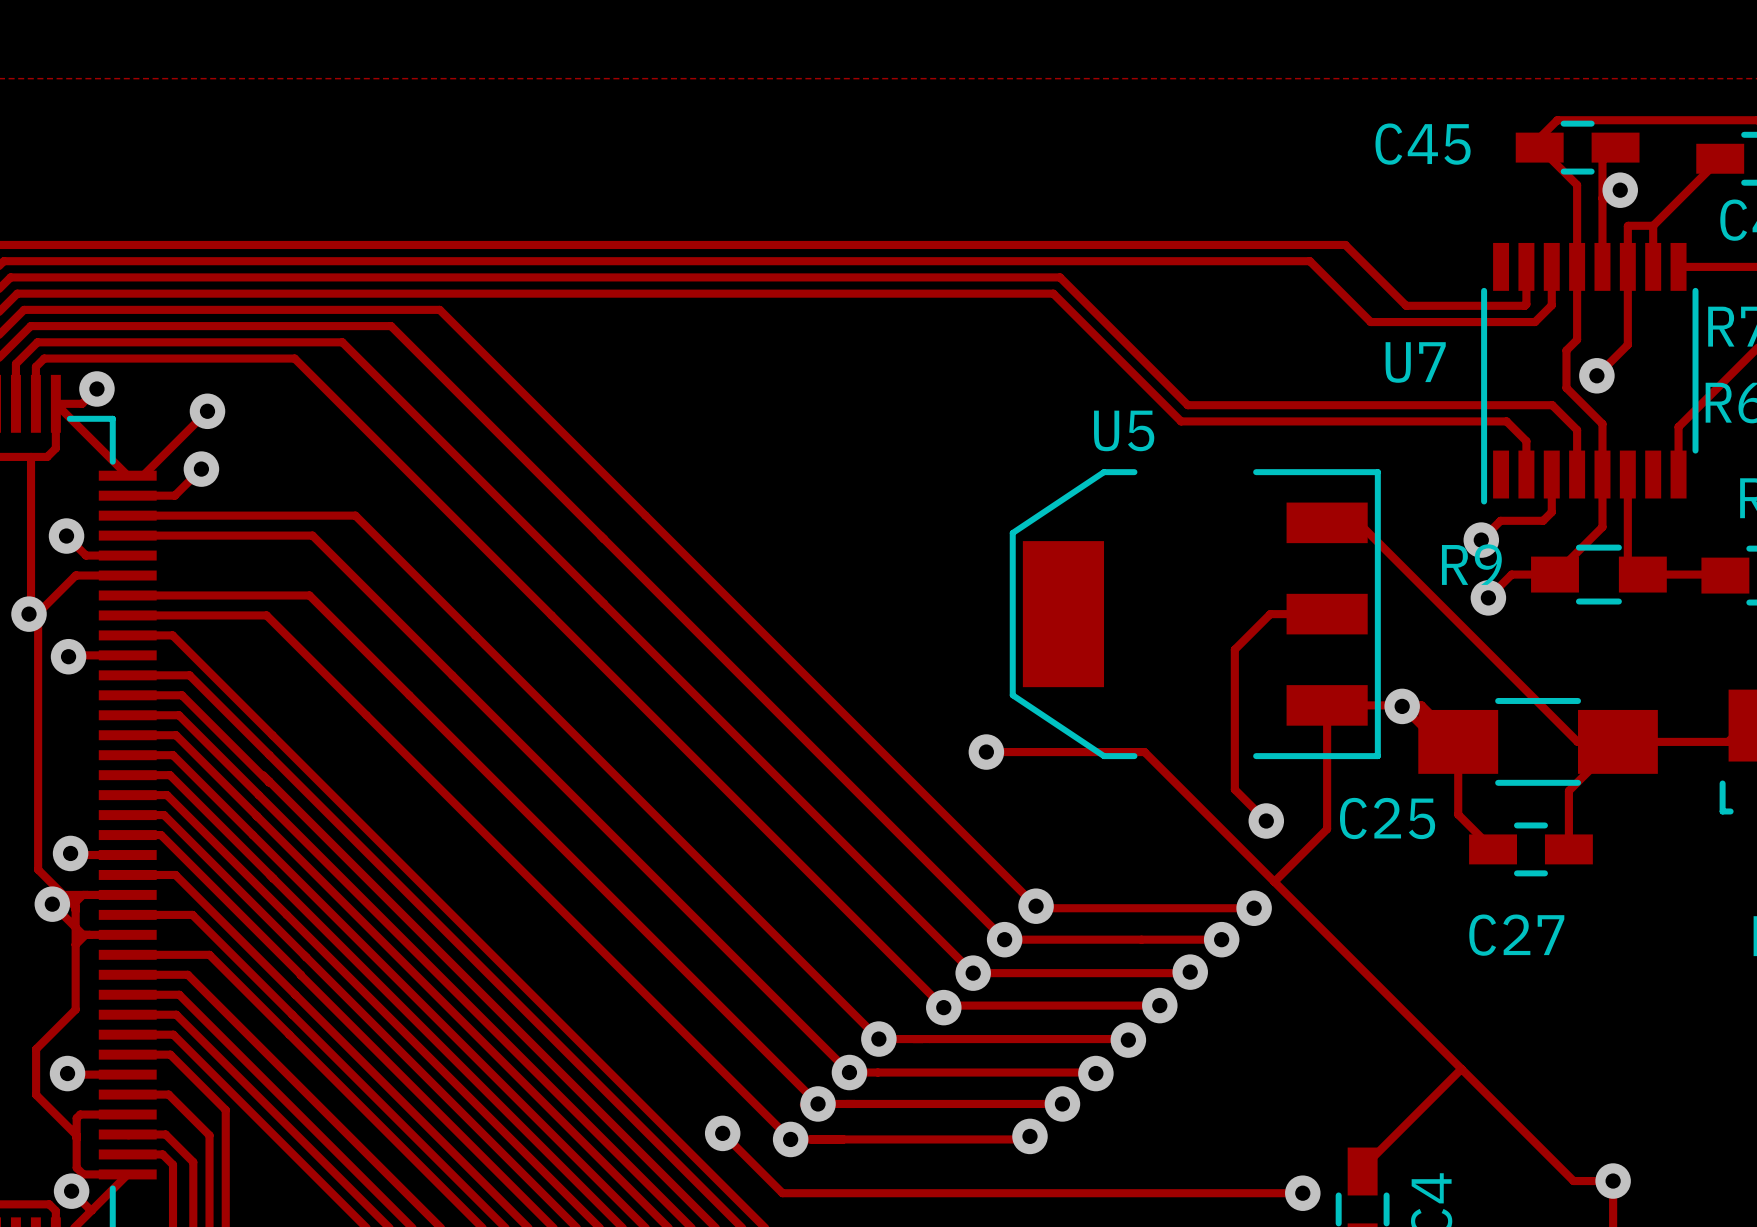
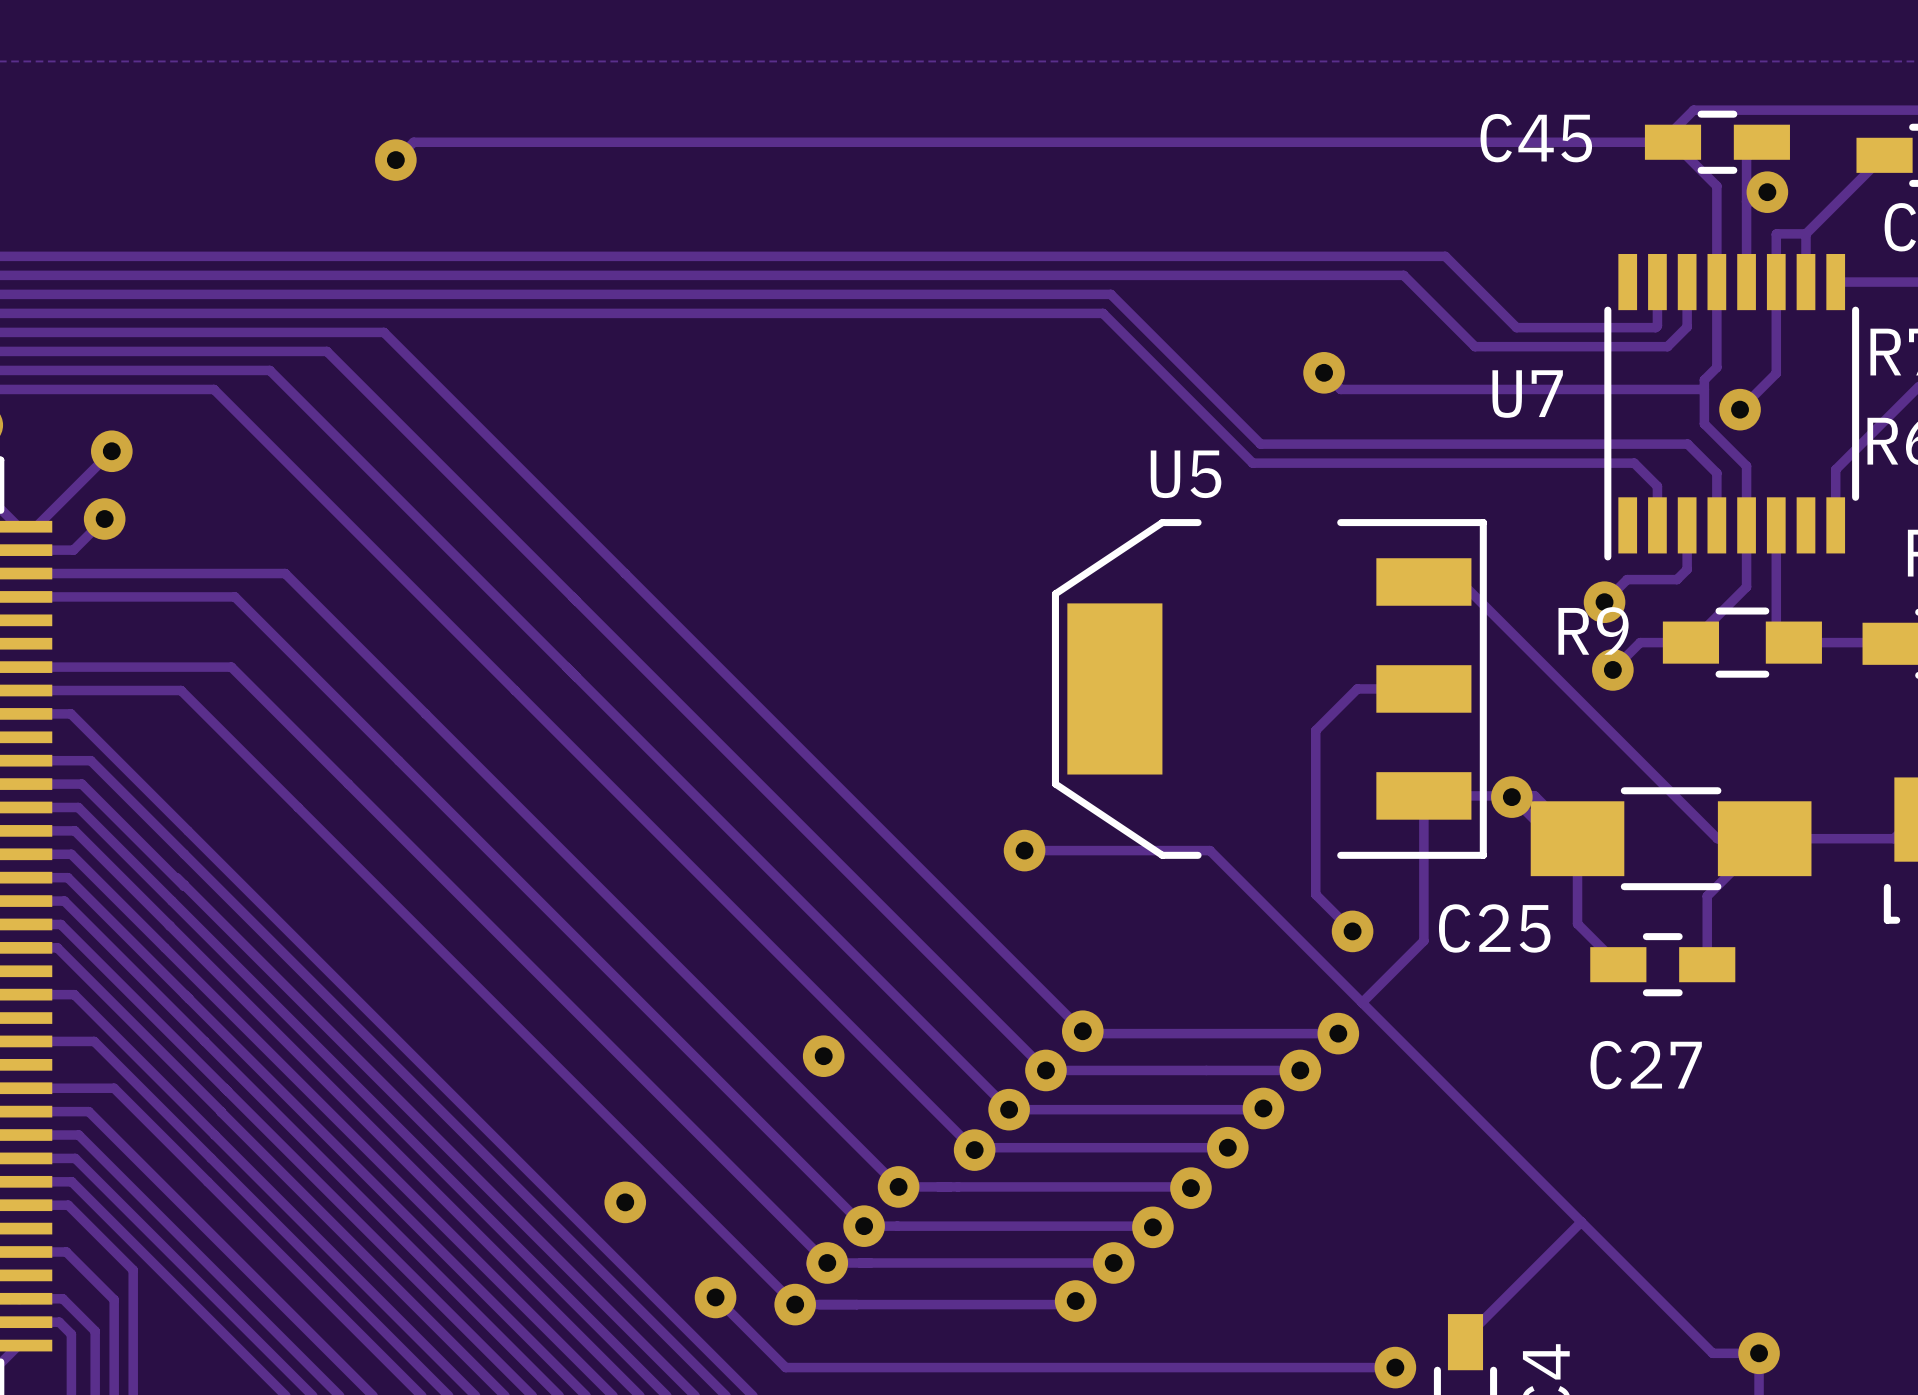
track: none -> (1673, 142) (413, 142) (395, 160)
via: none -> (395, 160)
track: none -> (1324, 372) (1340, 389) (1704, 389)
via: none -> (1324, 372)
via: none -> (823, 1056)
via: none -> (625, 1202)

